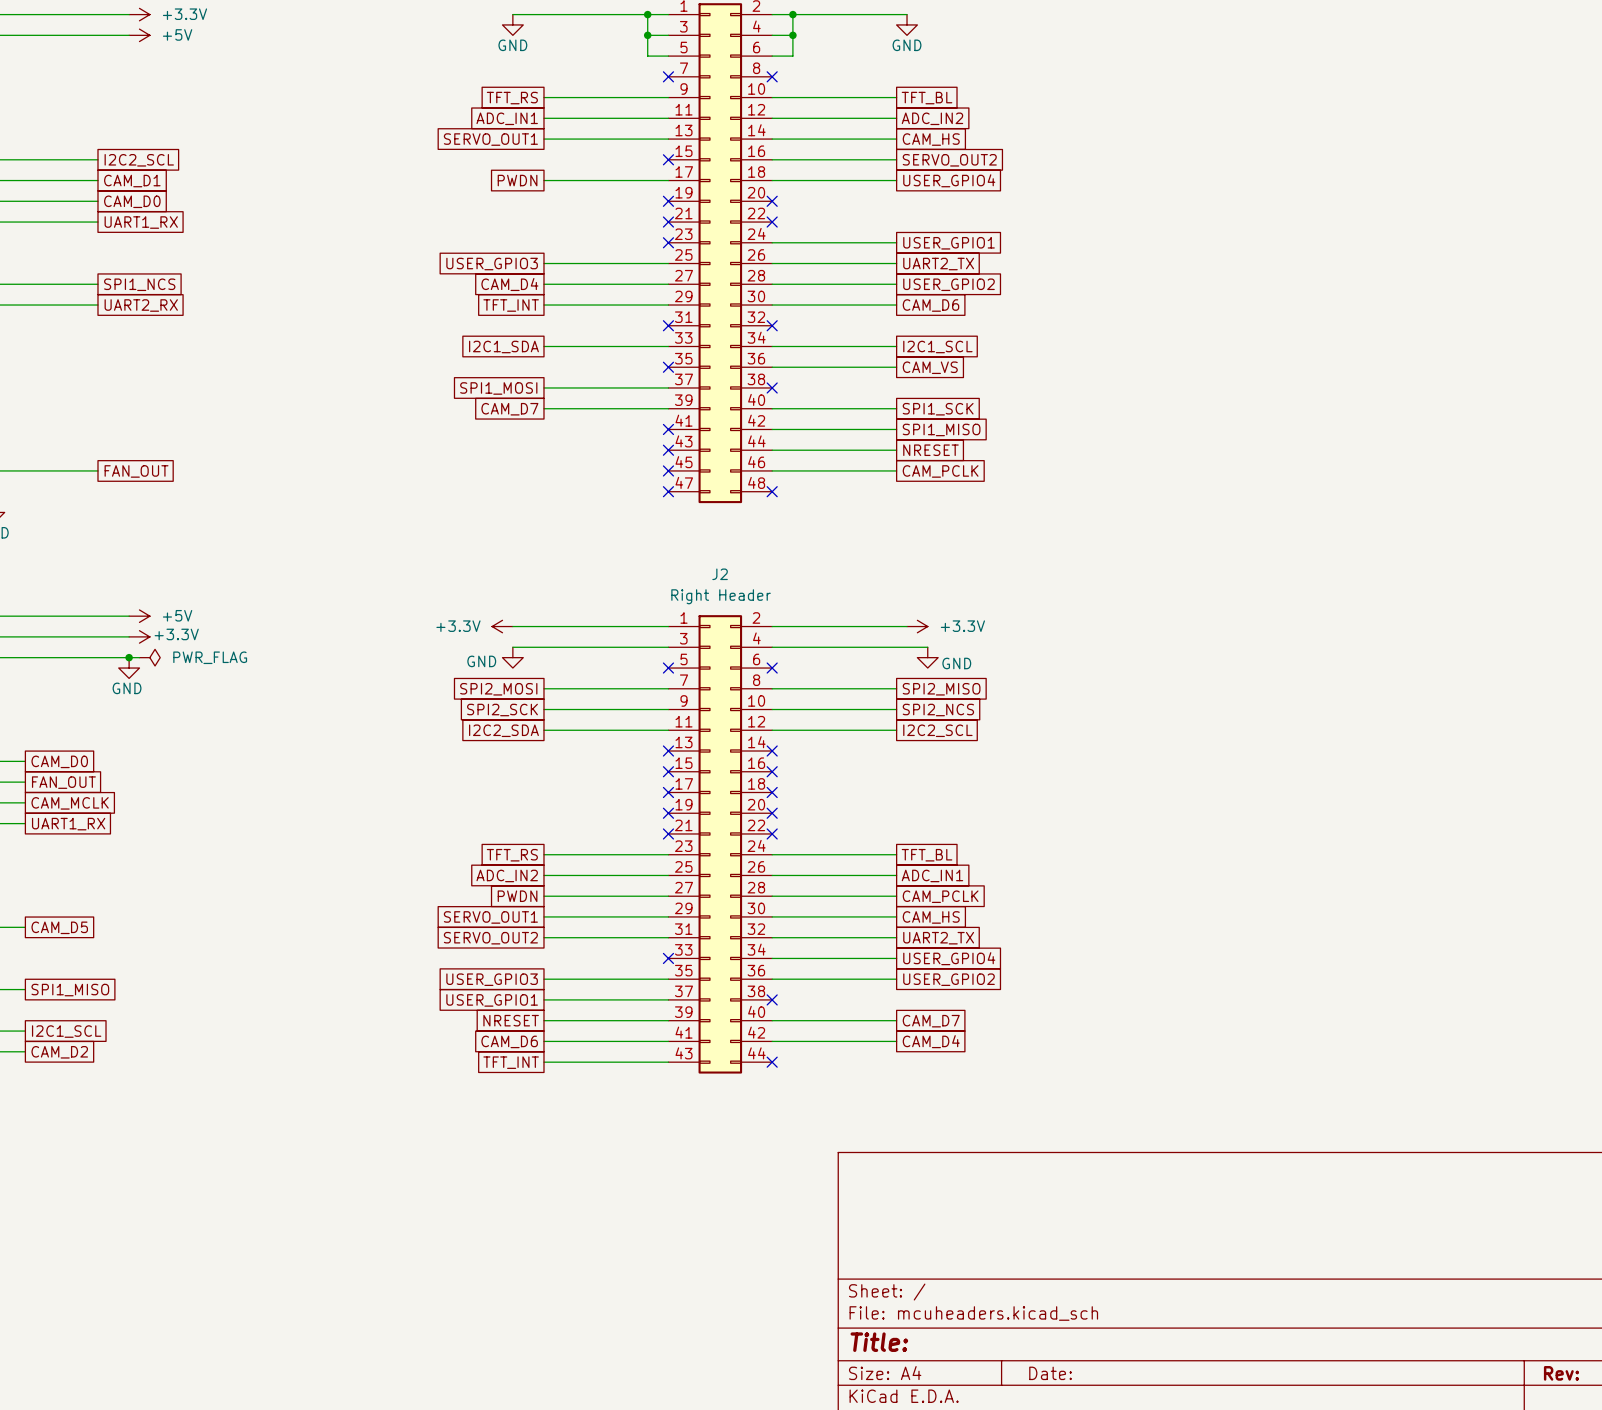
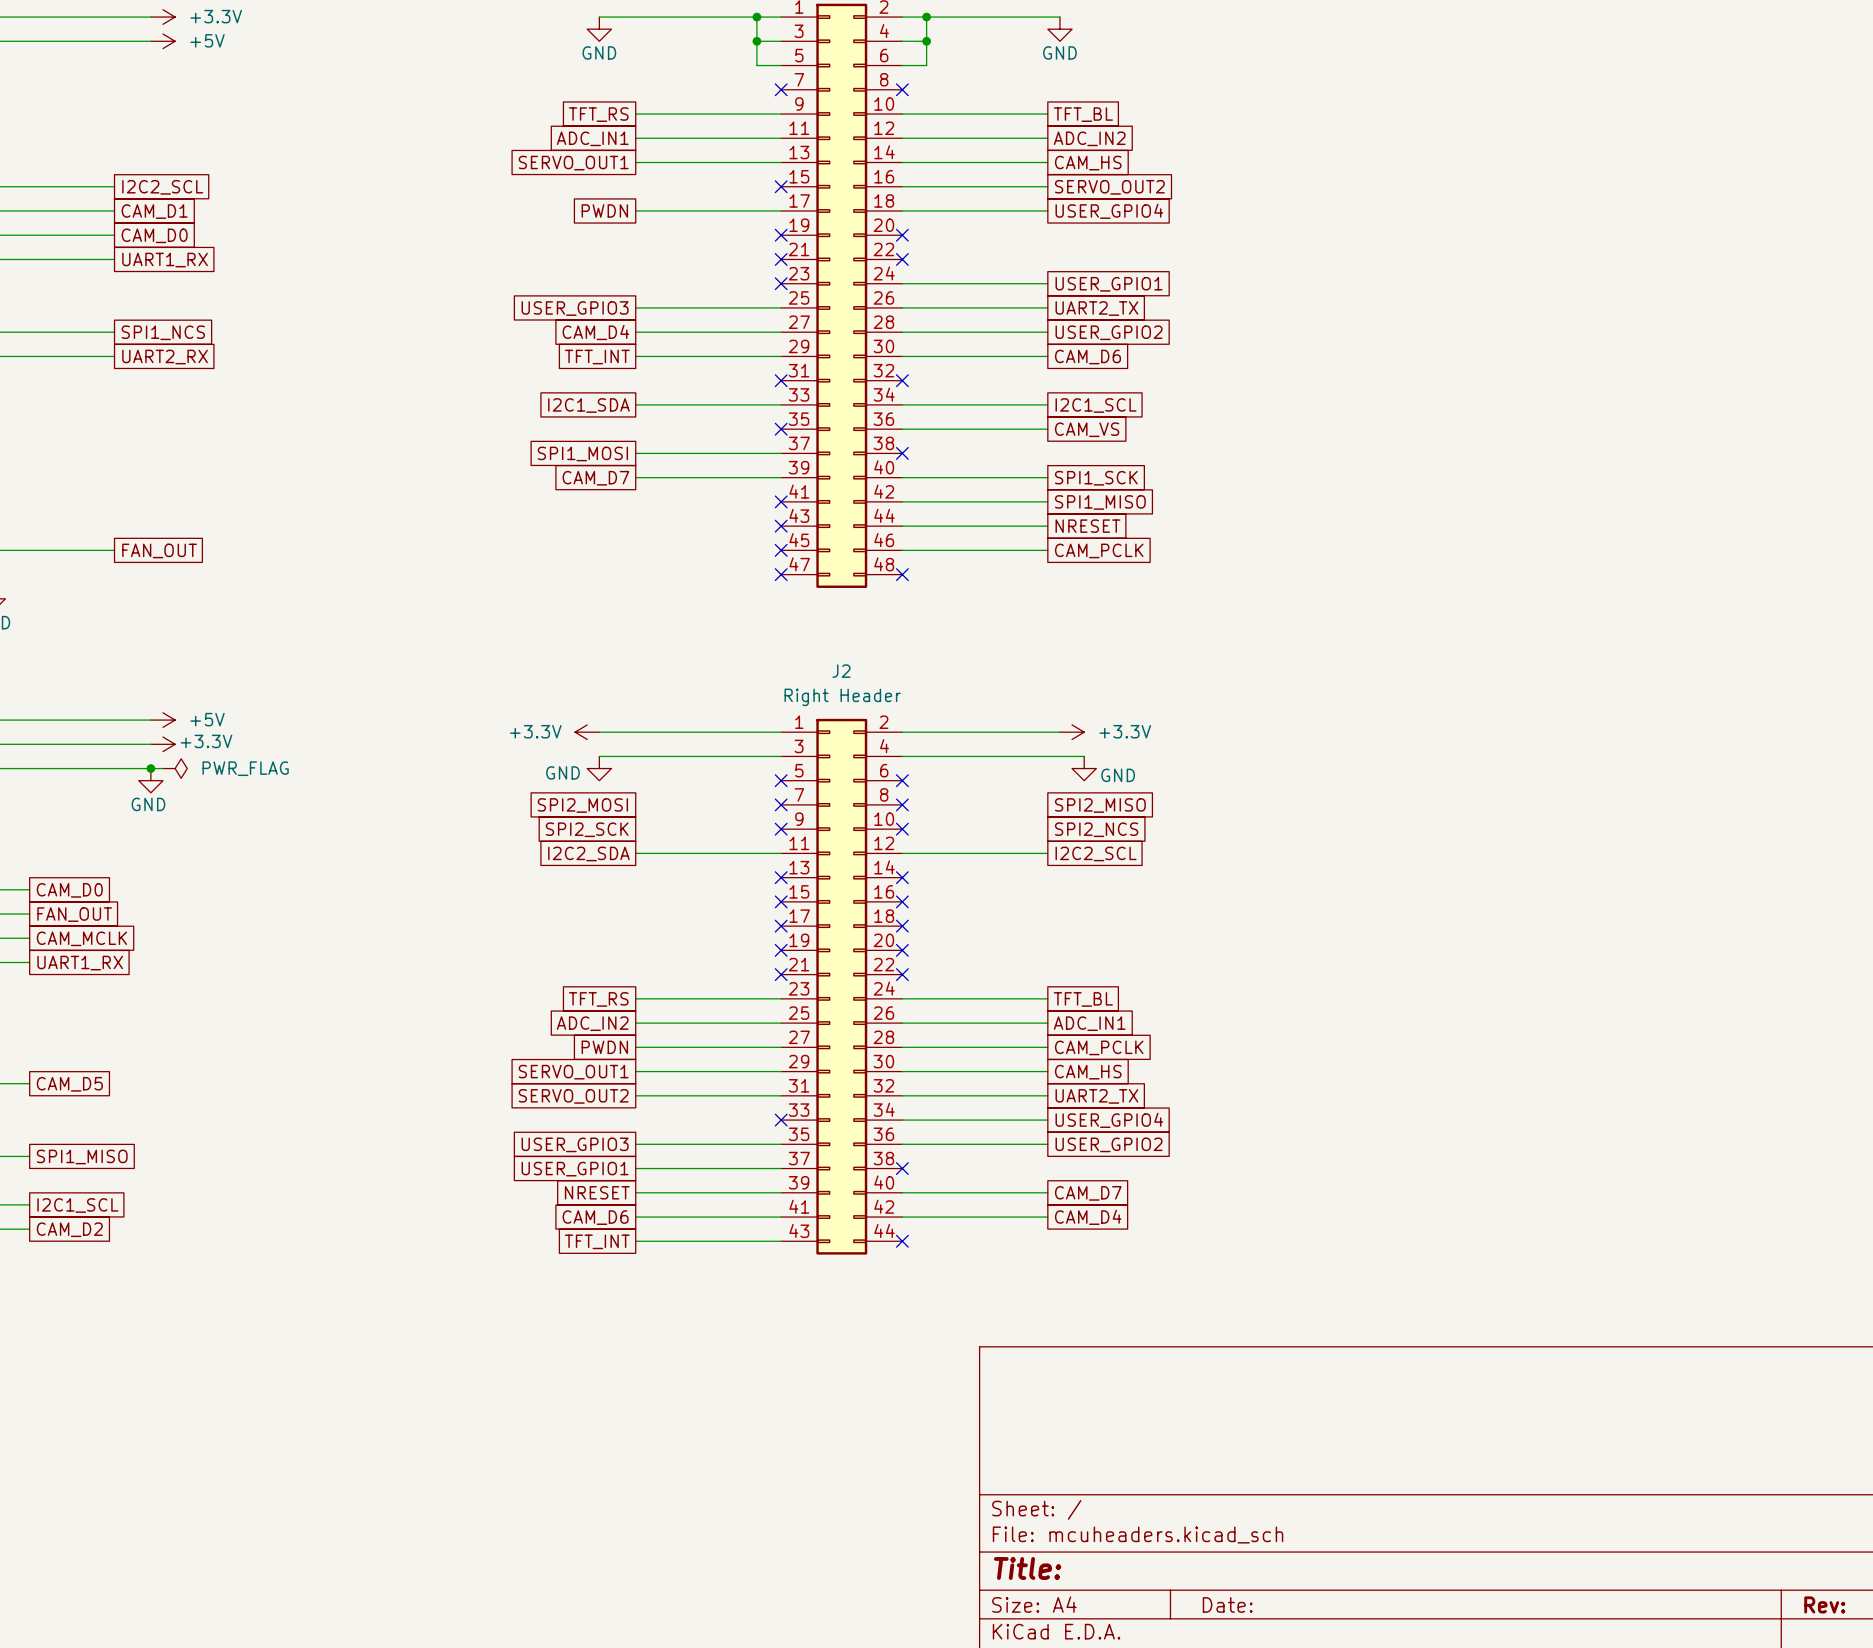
wire: (543, 688) (668, 688) -> none
no-connect mark: none -> (781, 804)
wire: (772, 688) (896, 688) -> none
no-connect mark: none -> (902, 804)
wire: (543, 709) (668, 709) -> none
no-connect mark: none -> (781, 829)
wire: (772, 709) (896, 709) -> none
no-connect mark: none -> (902, 829)

